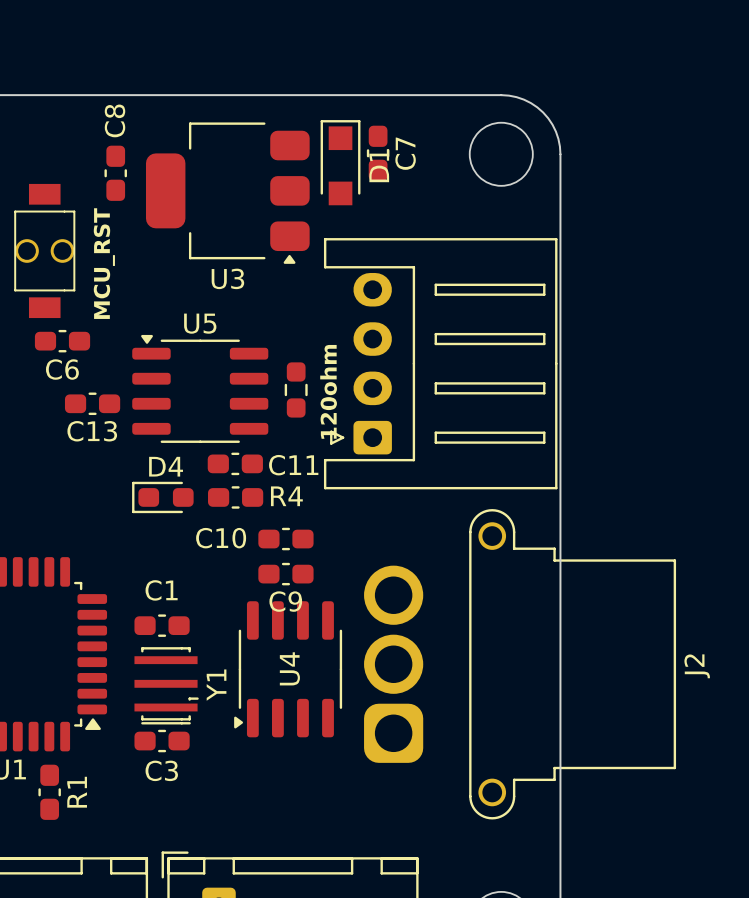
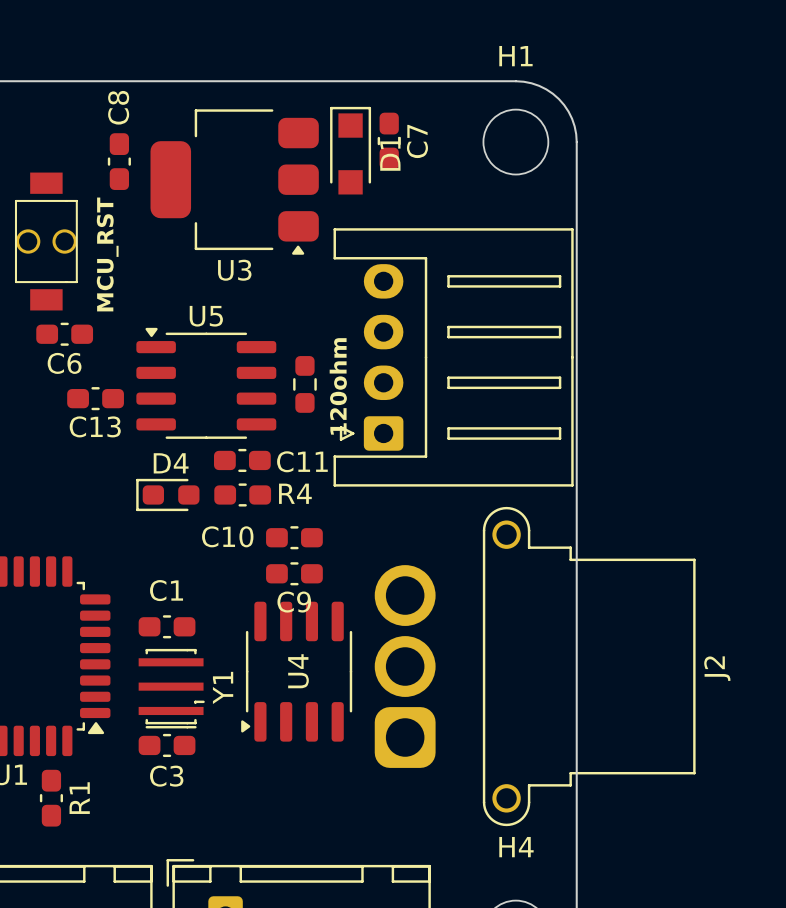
H1 name: none -> H1 (515, 56)
H4 name: none -> H4 (516, 847)

